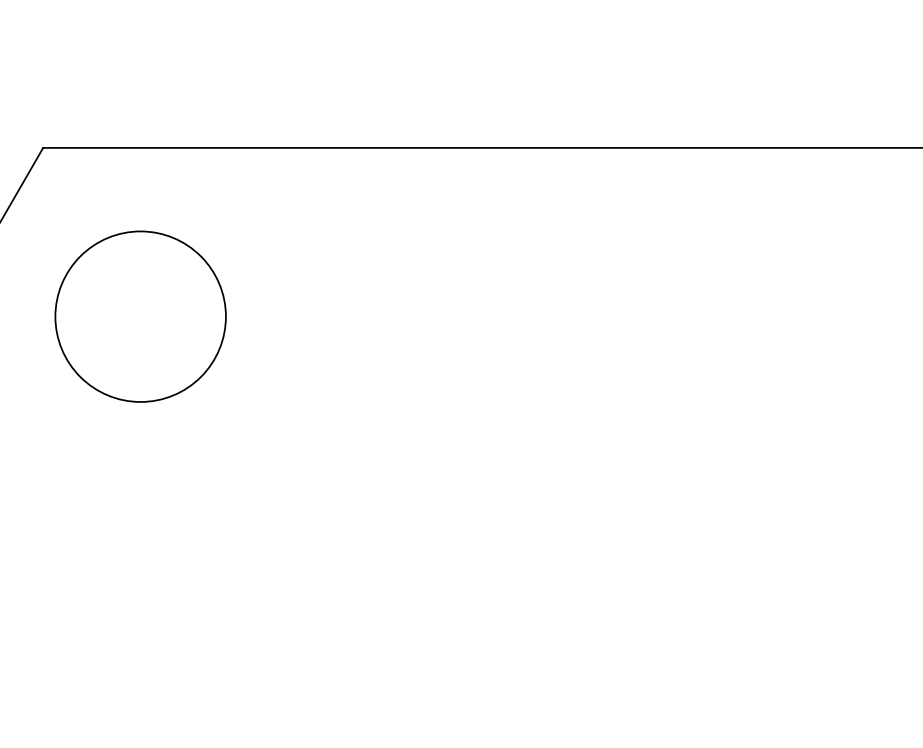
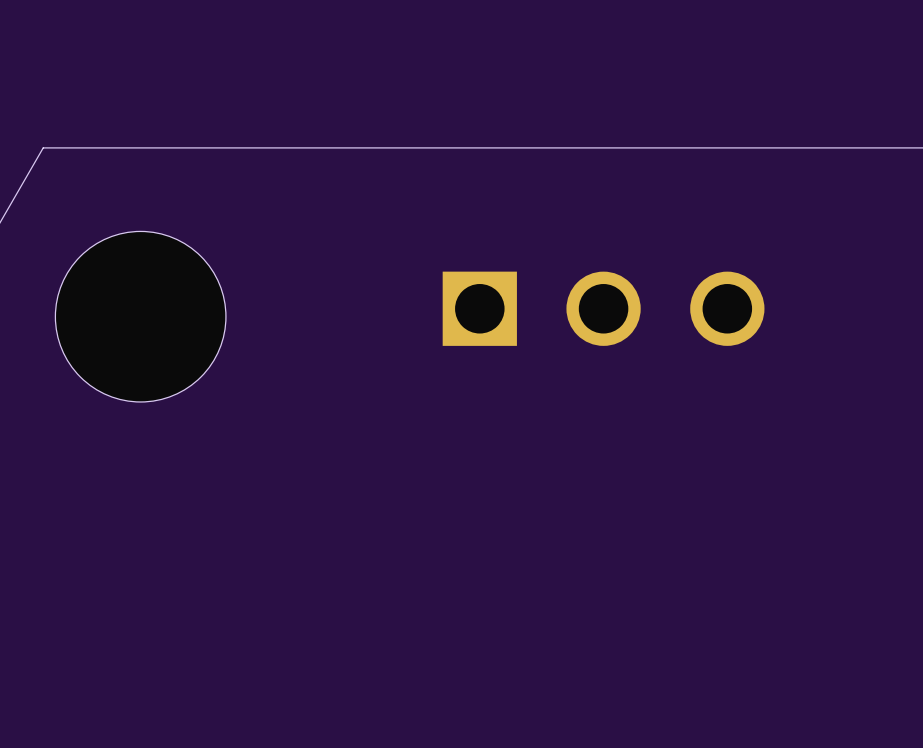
part: none -> (603, 308)

